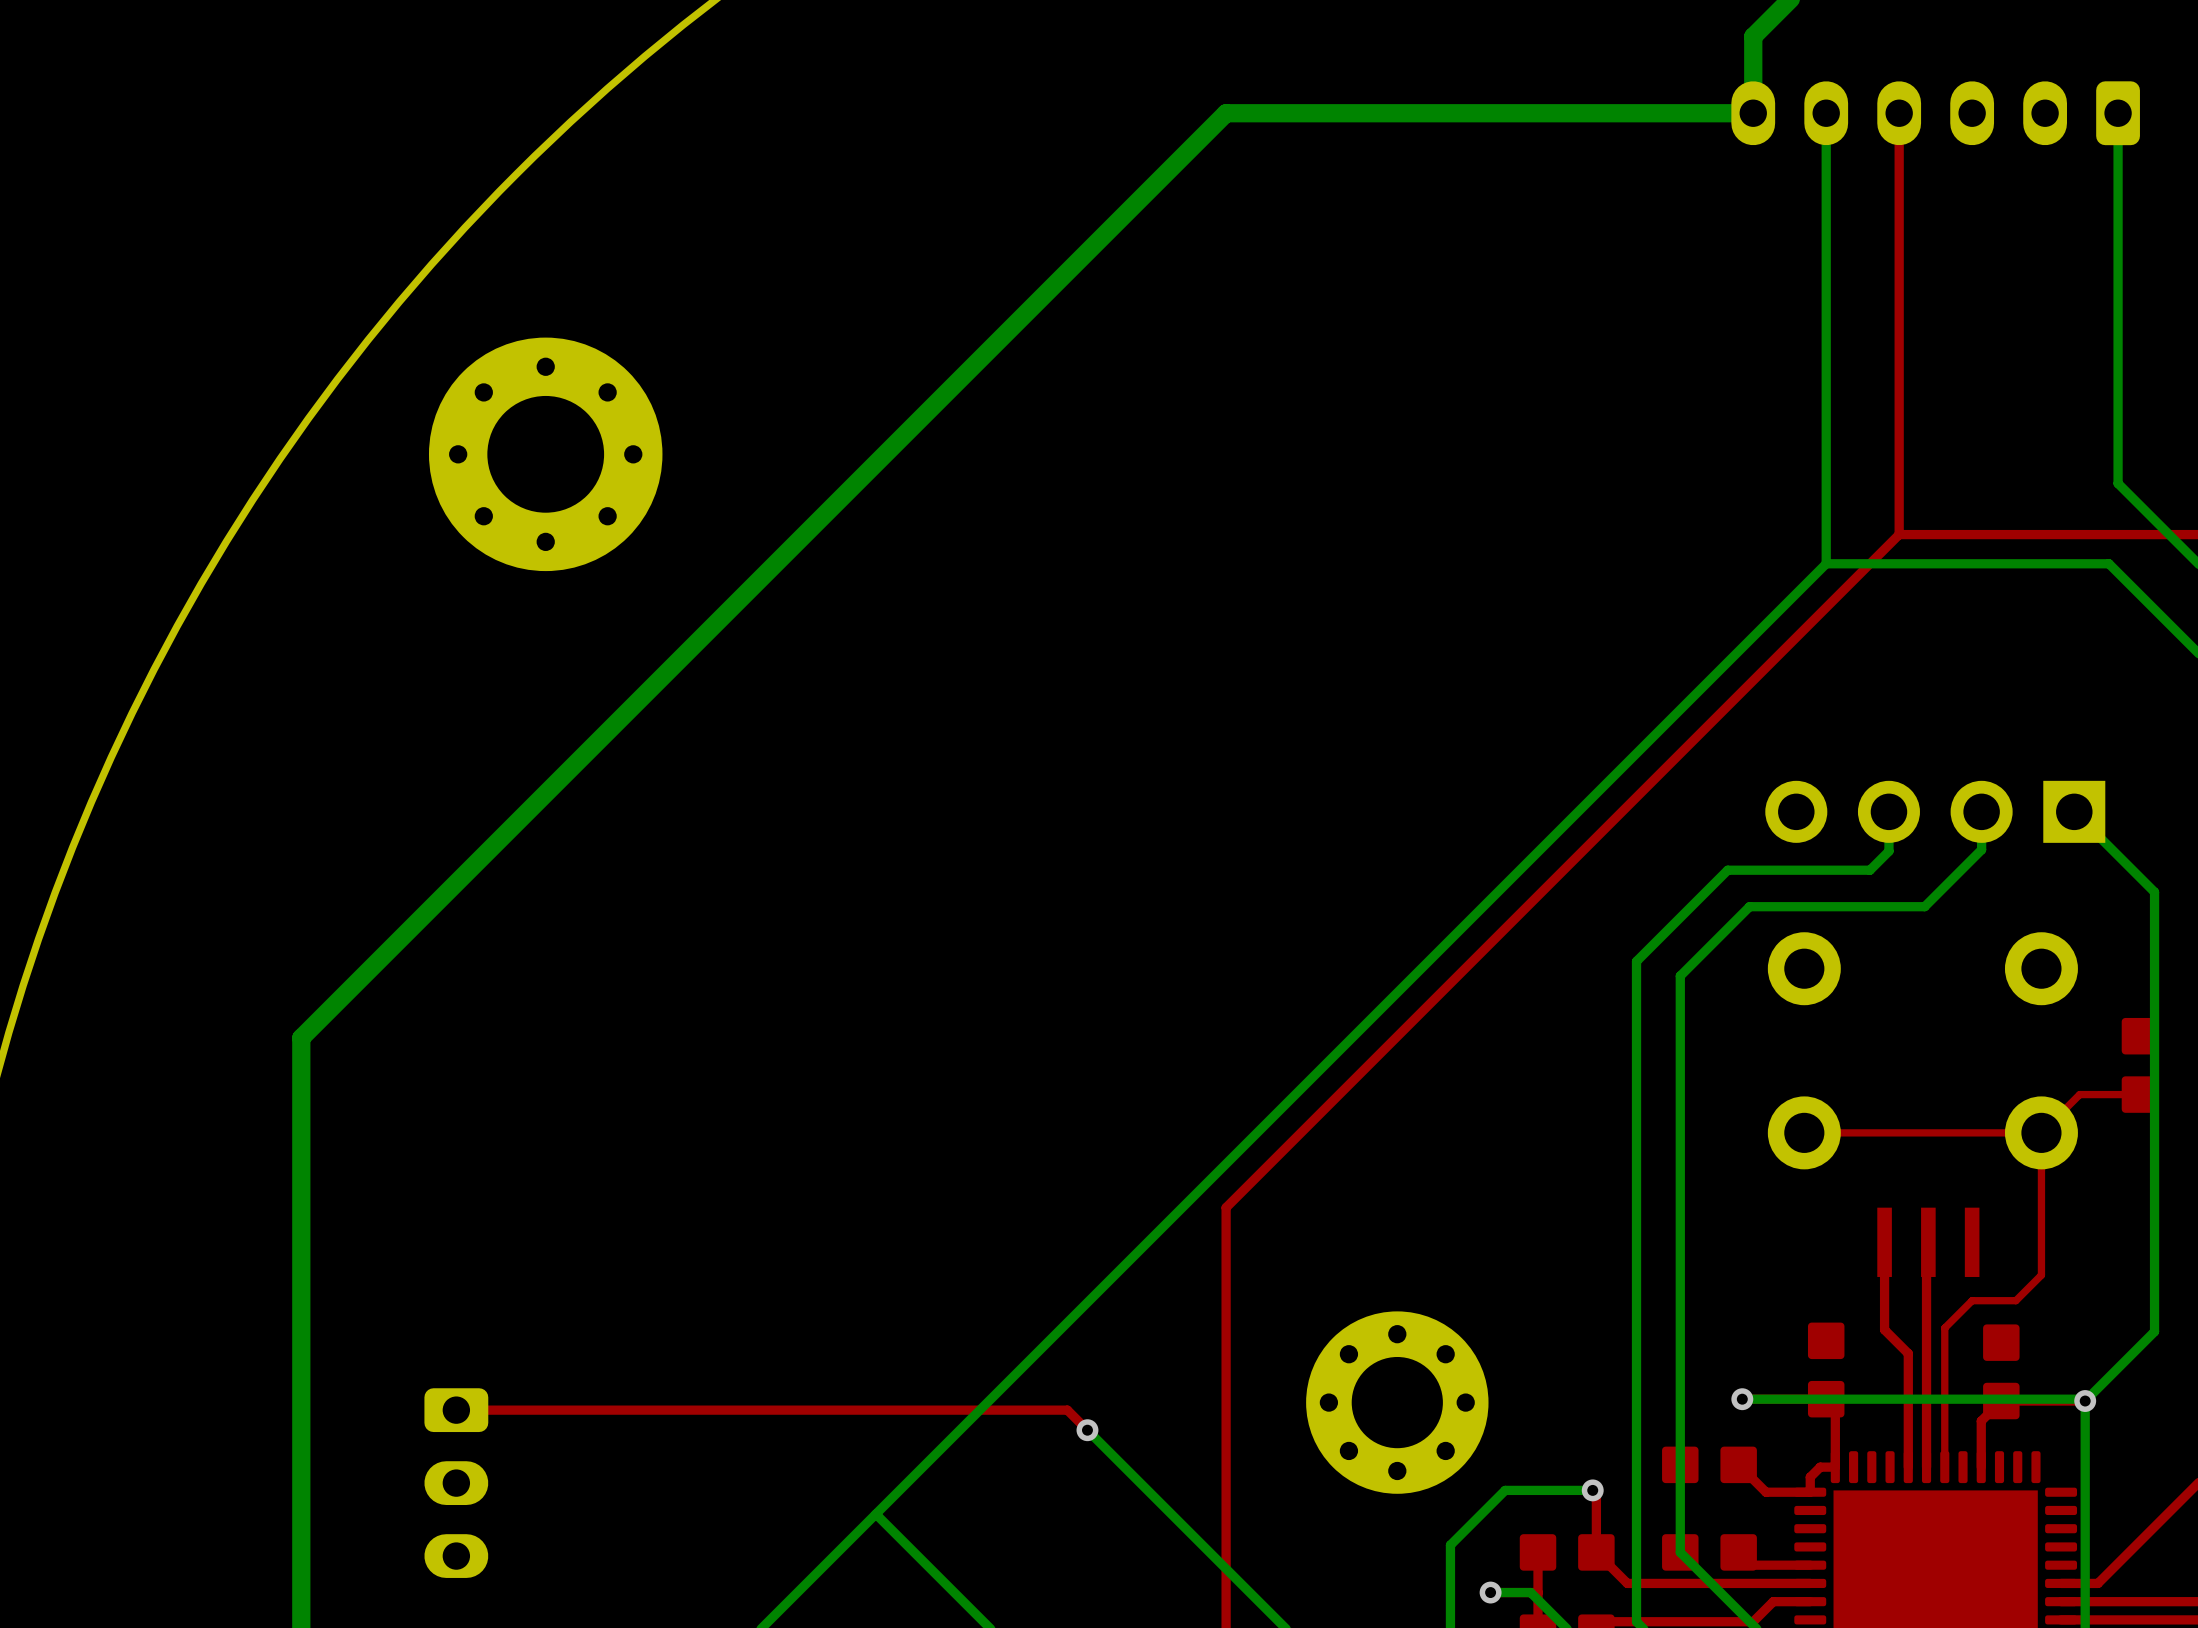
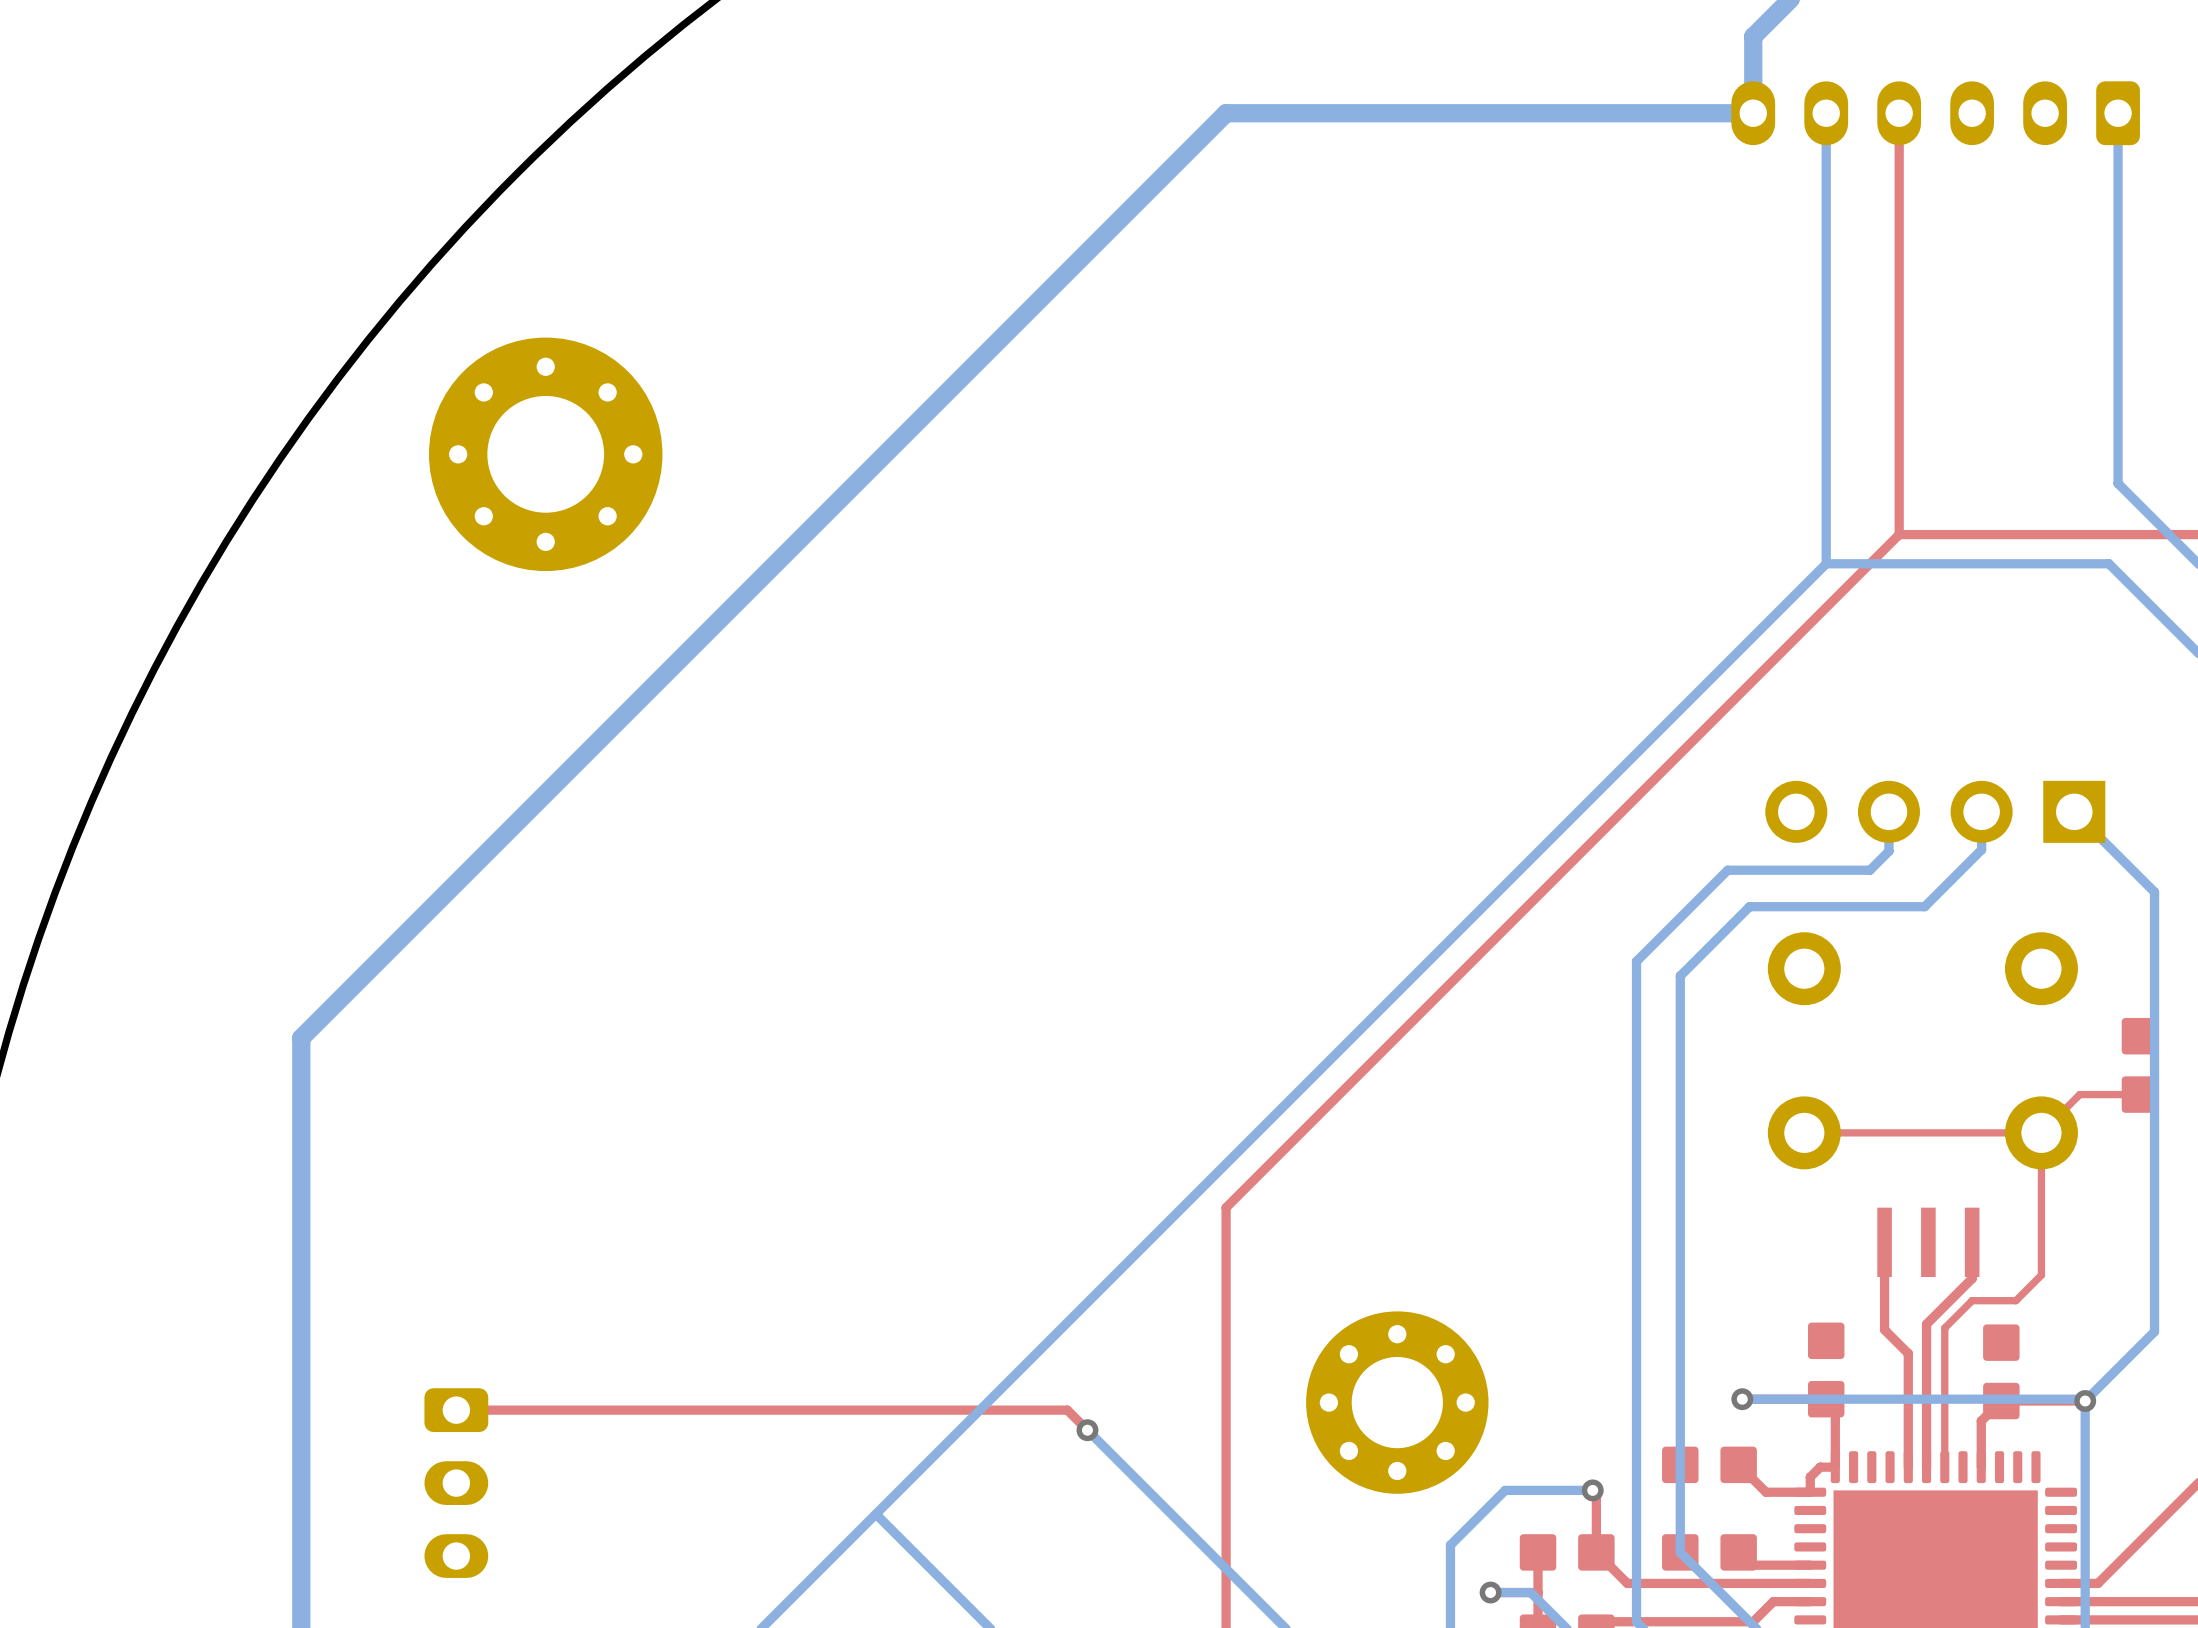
top track: (1926, 1251) (1926, 1324) -> (1972, 1242) (1972, 1278) (1926, 1324)

